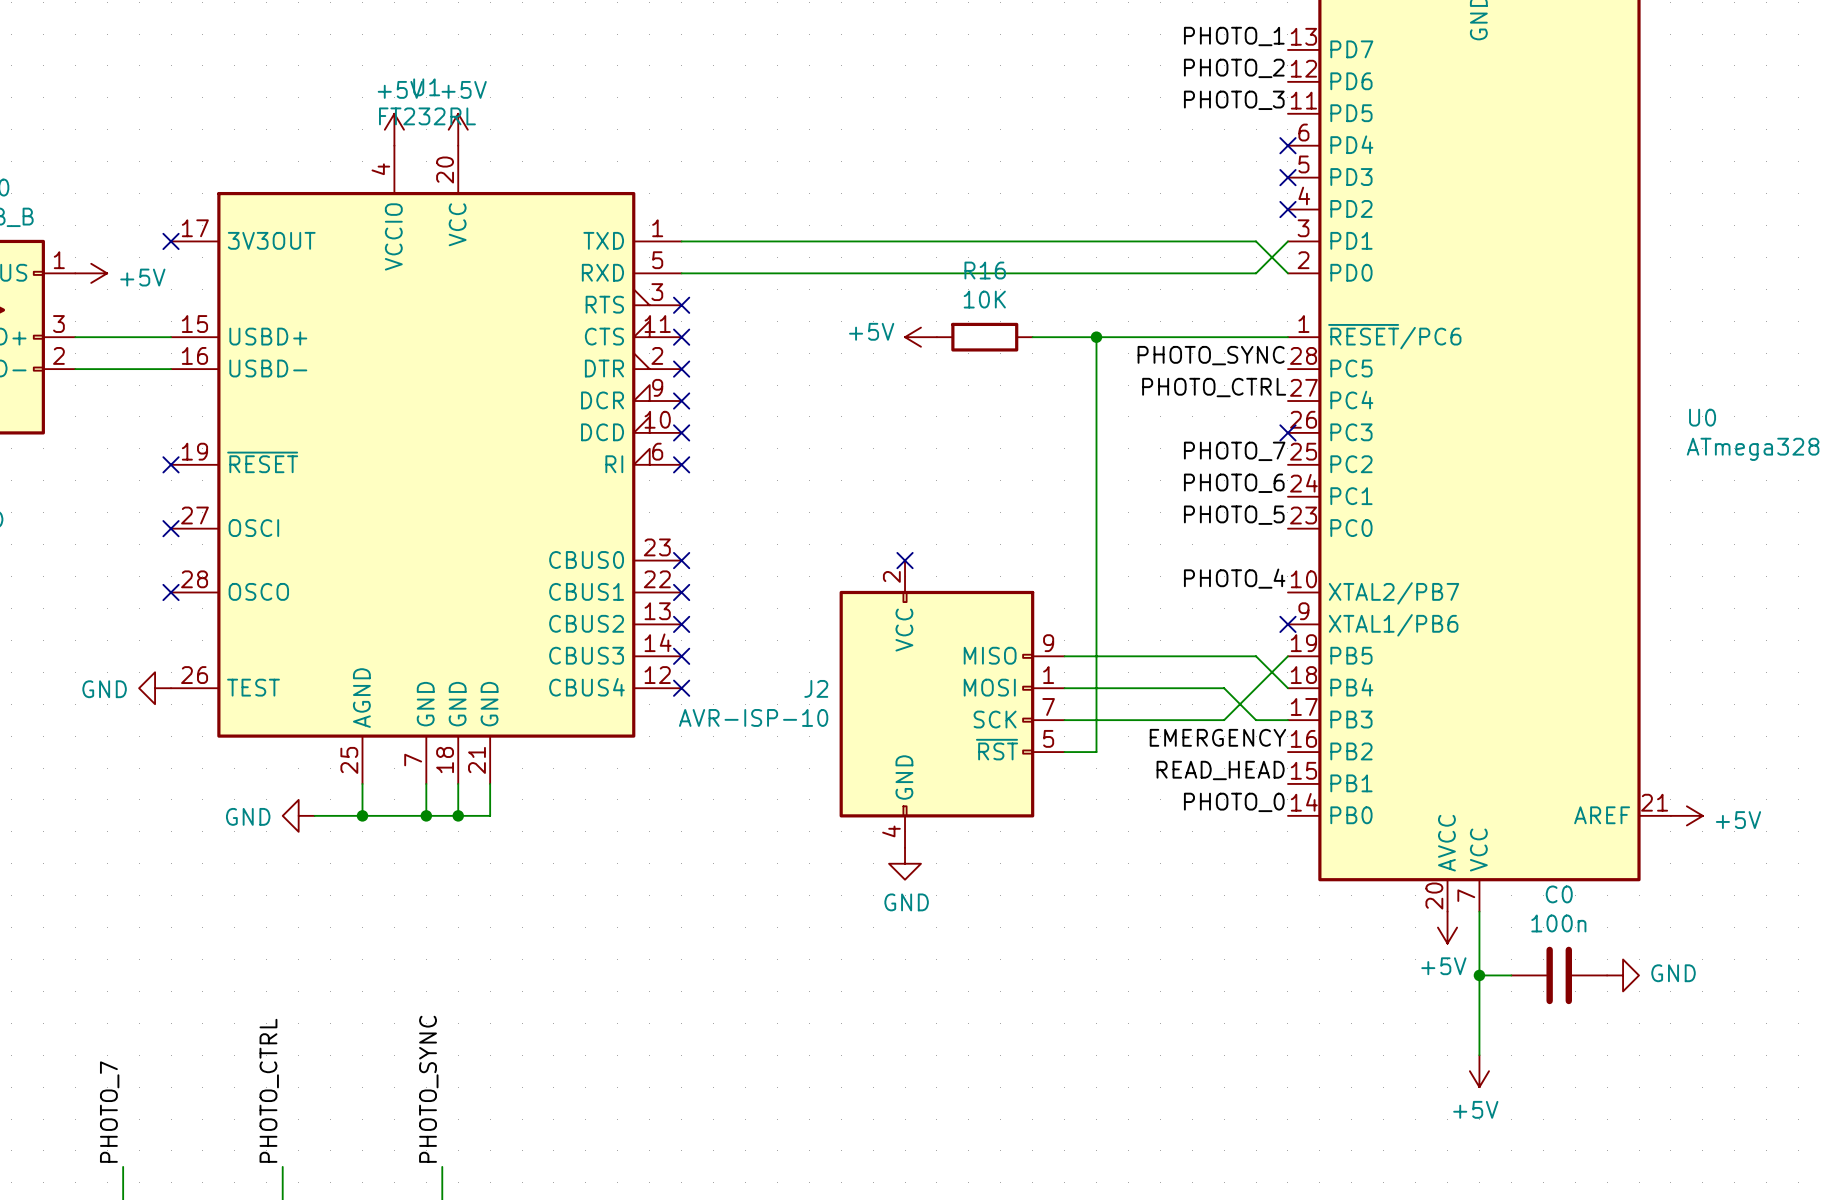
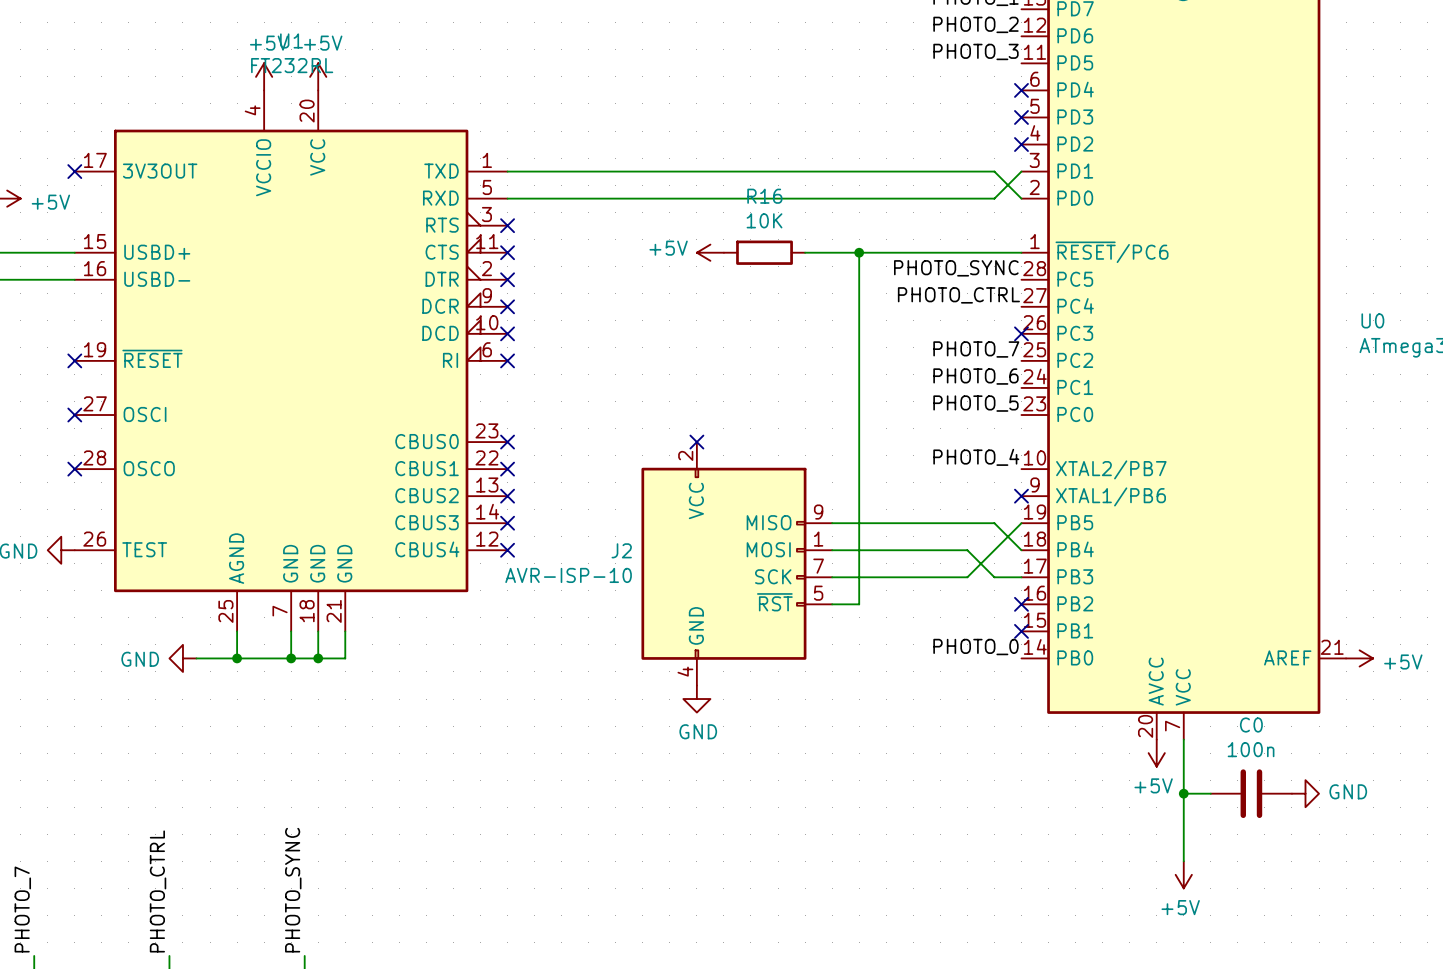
label: EMERGENCY (1217, 737) -> none
no-connect mark: none -> (1021, 604)
label: READ_HEAD (1220, 770) -> none
no-connect mark: none -> (1021, 631)

